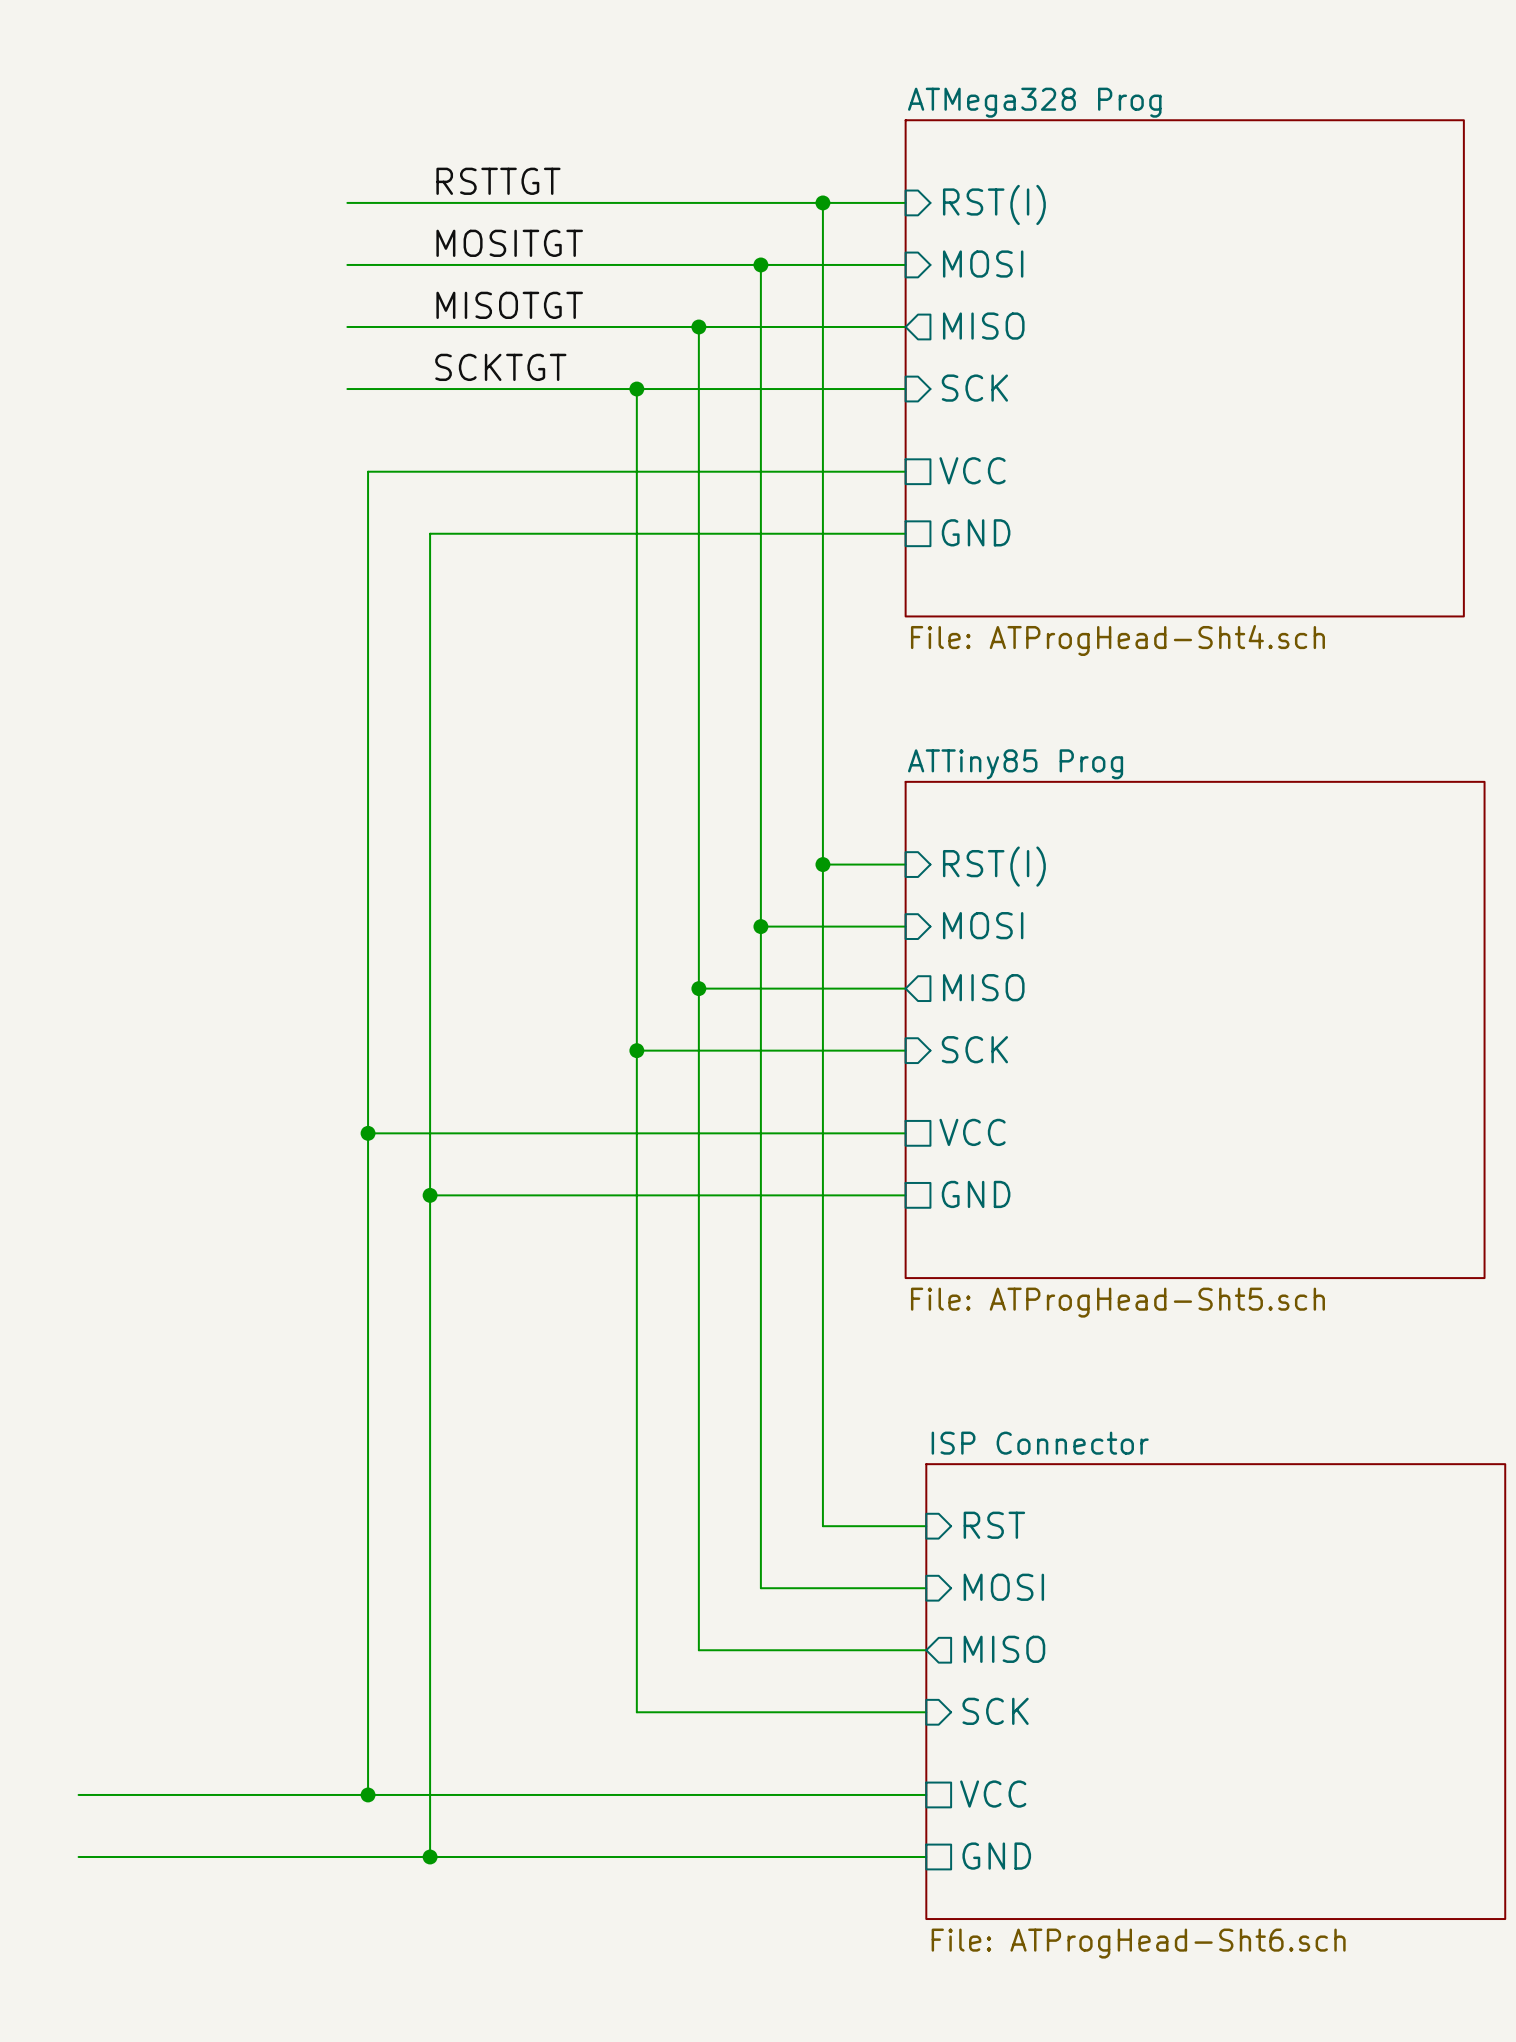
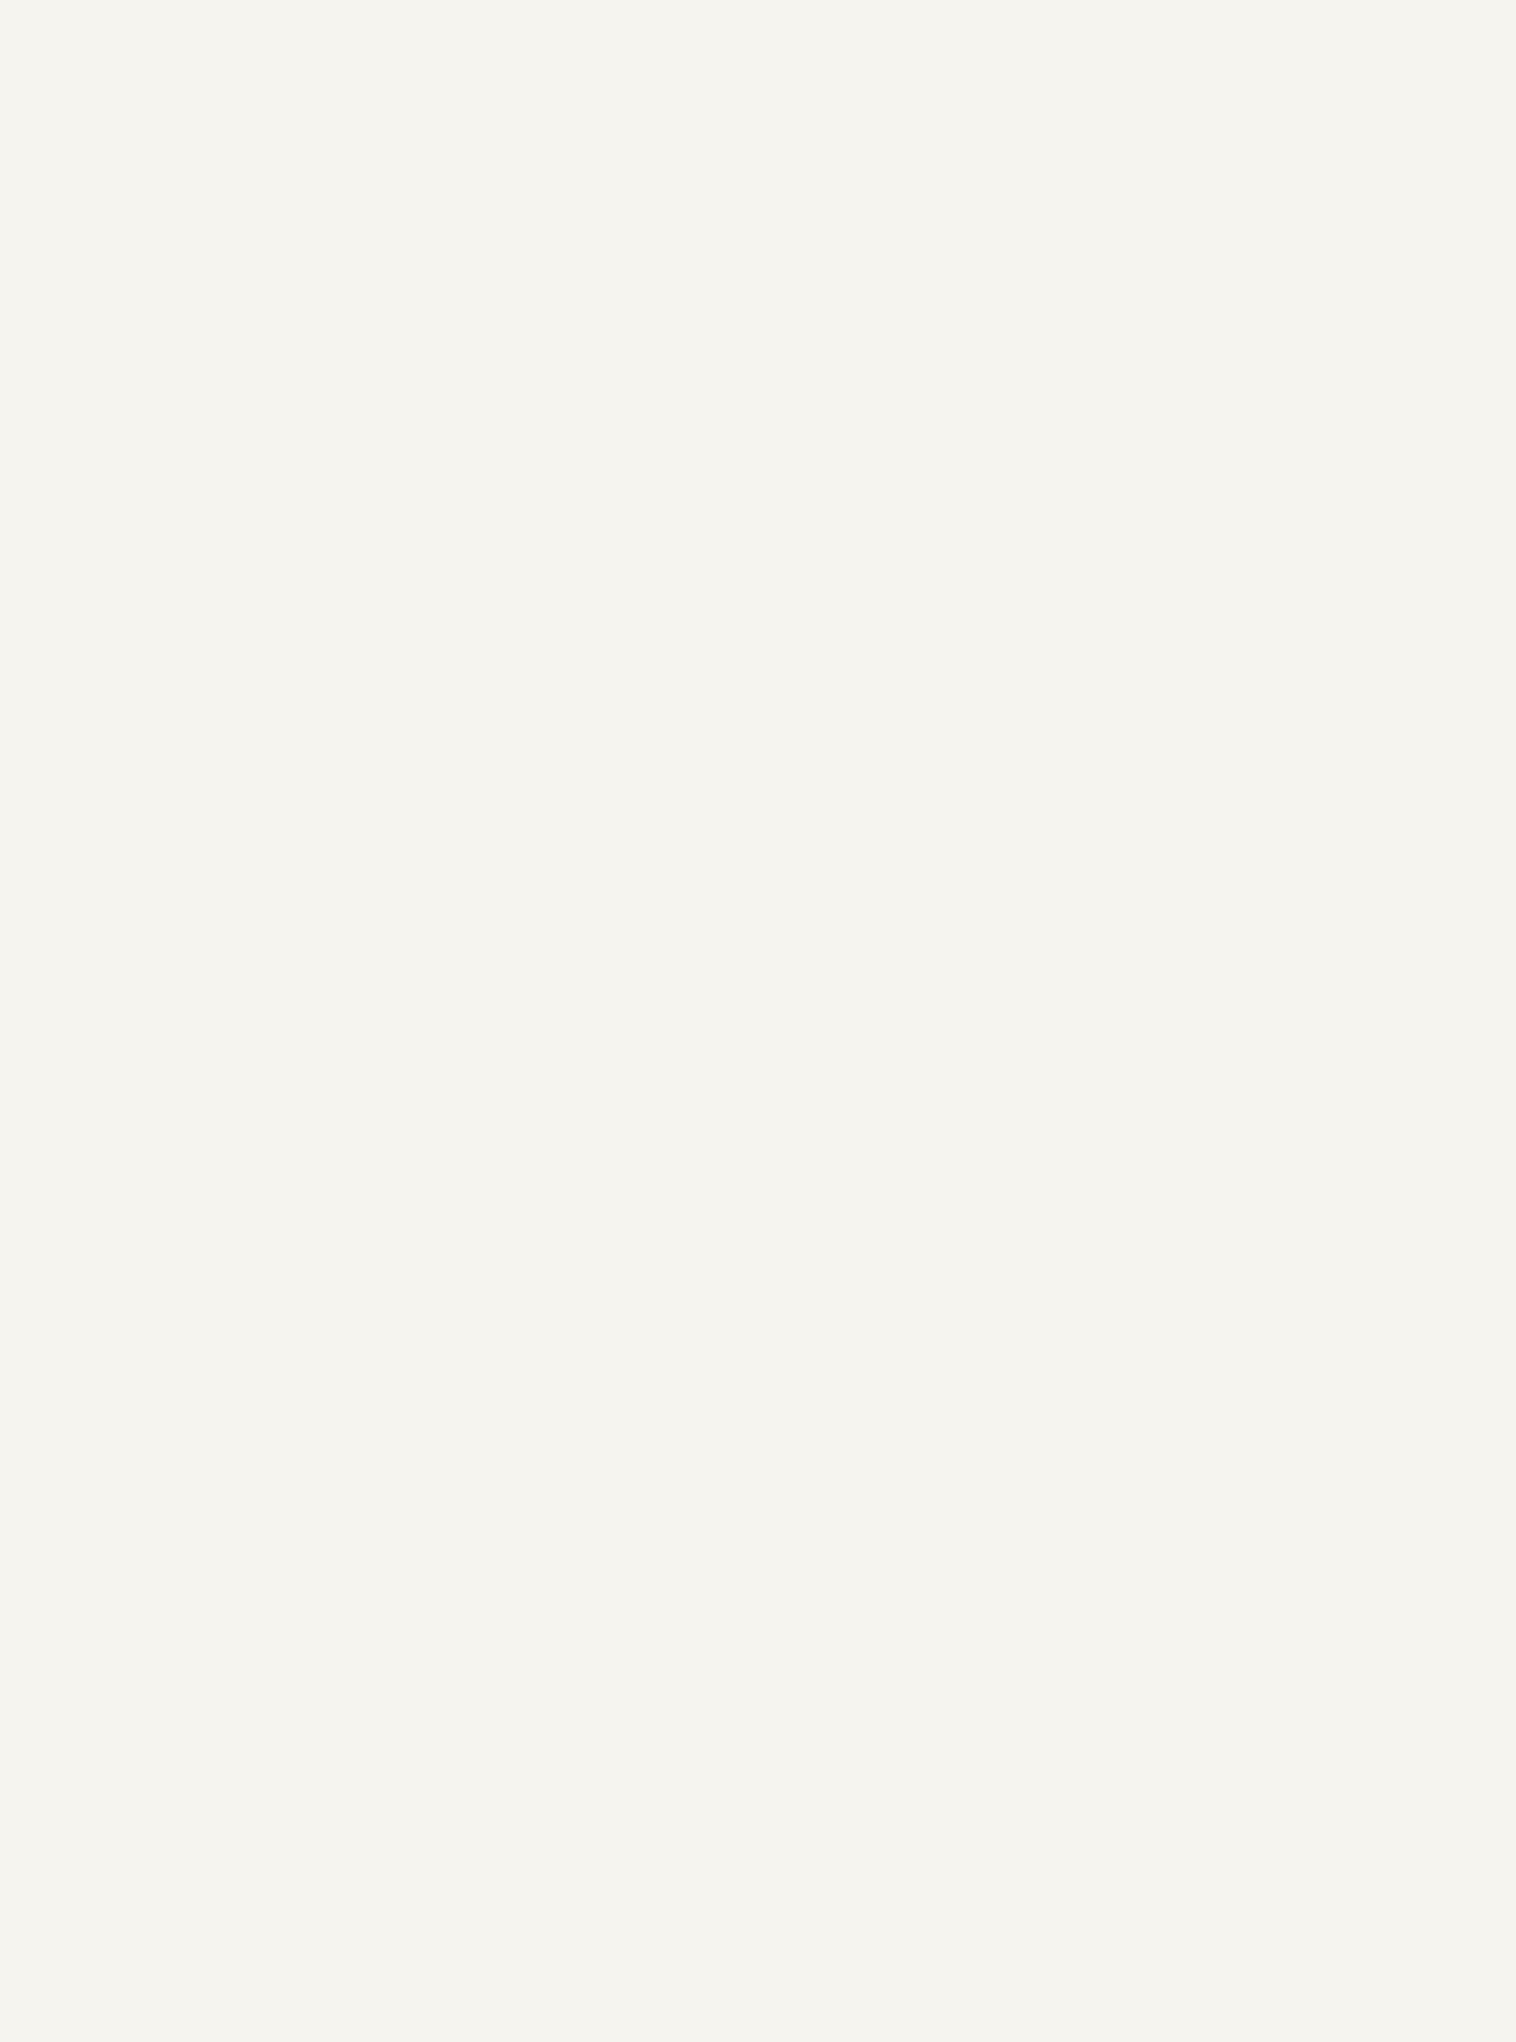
label: RSTTGT (498, 181) -> none
wire: (347, 202) (905, 202) -> none
wire: (822, 202) (822, 1526) (926, 1526) -> none
junction: (822, 202) -> none
sheet pin: RST(I) (994, 204) -> none
label: MOSITGT (509, 243) -> none
wire: (347, 264) (905, 264) -> none
wire: (760, 264) (760, 1588) (926, 1588) -> none
junction: (760, 264) -> none
sheet pin: MOSI (983, 264) -> none
label: MISOTGT (509, 305) -> none
wire: (347, 326) (905, 326) -> none
wire: (698, 326) (698, 1650) (926, 1650) -> none
junction: (698, 326) -> none
sheet pin: MISO (983, 326) -> none
label: SCKTGT (500, 367) -> none
sheet ATMega328 Prog: File: ATProgHead-Sht4.sch (1184, 368) -> none
sheet pin: SCK (974, 388) -> none
wire: (347, 389) (905, 389) -> none
wire: (636, 389) (636, 1712) (926, 1712) -> none
junction: (636, 389) -> none
sheet pin: VCC (972, 470) -> none
wire: (905, 471) (368, 471) (368, 1794) -> none
sheet pin: GND (976, 532) -> none
wire: (905, 533) (430, 533) (430, 1856) -> none
wire: (822, 864) (905, 864) -> none
junction: (822, 864) -> none
sheet pin: RST(I) (994, 866) -> none
sheet pin: MOSI (983, 925) -> none
wire: (760, 926) (905, 926) -> none
junction: (760, 926) -> none
sheet pin: MISO (983, 987) -> none
wire: (698, 988) (905, 988) -> none
junction: (698, 988) -> none
sheet ATTiny85 Prog: File: ATProgHead-Sht5.sch (1195, 1029) -> none
sheet pin: SCK (974, 1049) -> none
wire: (636, 1050) (905, 1050) -> none
junction: (636, 1050) -> none
sheet pin: VCC (972, 1132) -> none
wire: (368, 1133) (905, 1133) -> none
junction: (368, 1133) -> none
sheet pin: GND (976, 1194) -> none
wire: (430, 1195) (905, 1195) -> none
junction: (430, 1195) -> none
sheet pin: RST (994, 1525) -> none
sheet pin: MOSI (1003, 1587) -> none
sheet pin: MISO (1004, 1649) -> none
sheet ISP Connector: File: ATProgHead-Sht6.sch (1215, 1691) -> none
sheet pin: SCK (995, 1711) -> none
wire: (78, 1794) (926, 1794) -> none
junction: (368, 1794) -> none
sheet pin: VCC (993, 1794) -> none
wire: (78, 1856) (926, 1856) -> none
junction: (430, 1856) -> none
sheet pin: GND (996, 1856) -> none

